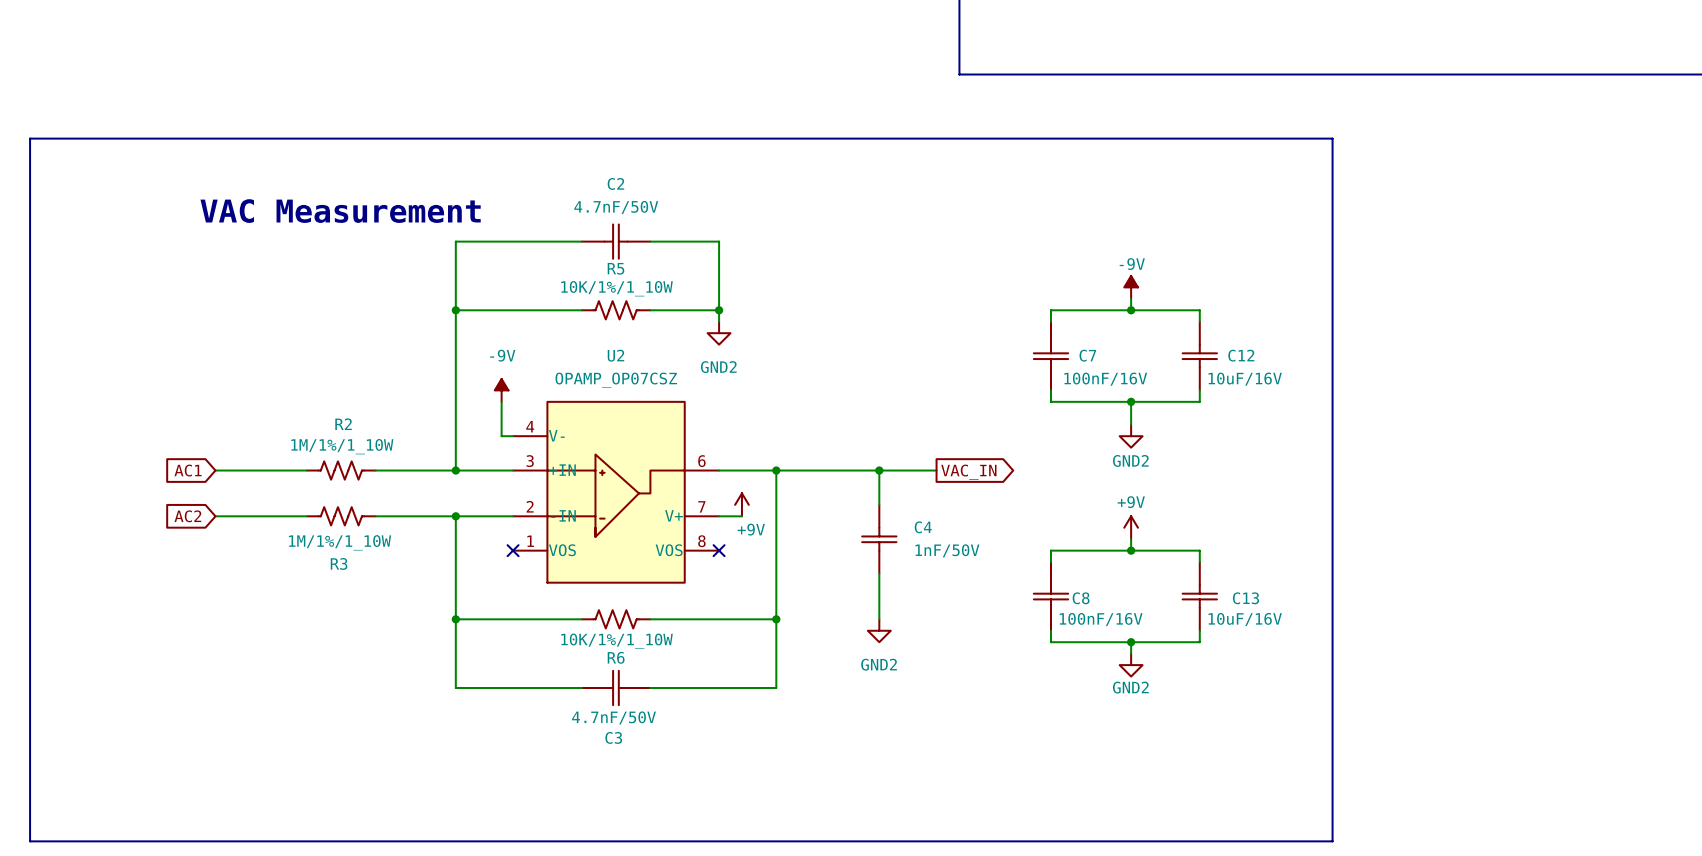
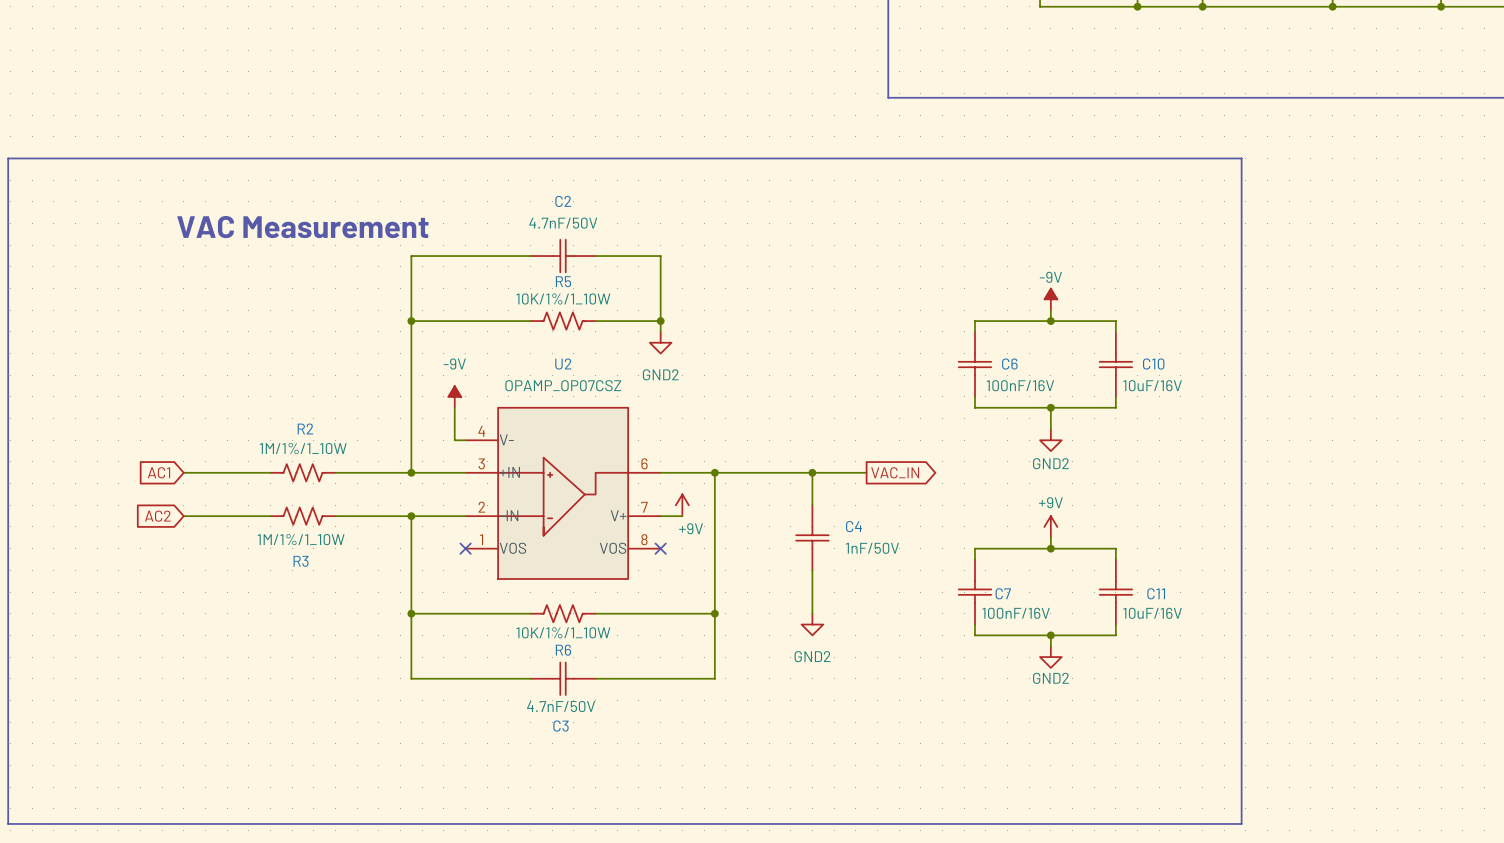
C7 name: C7 (1087, 355) -> C6 (1009, 364)
C12 name: C12 (1241, 355) -> C10 (1153, 364)
C8 name: C8 (1081, 598) -> C7 (1003, 593)
C13 name: C13 (1245, 598) -> C11 (1156, 593)

